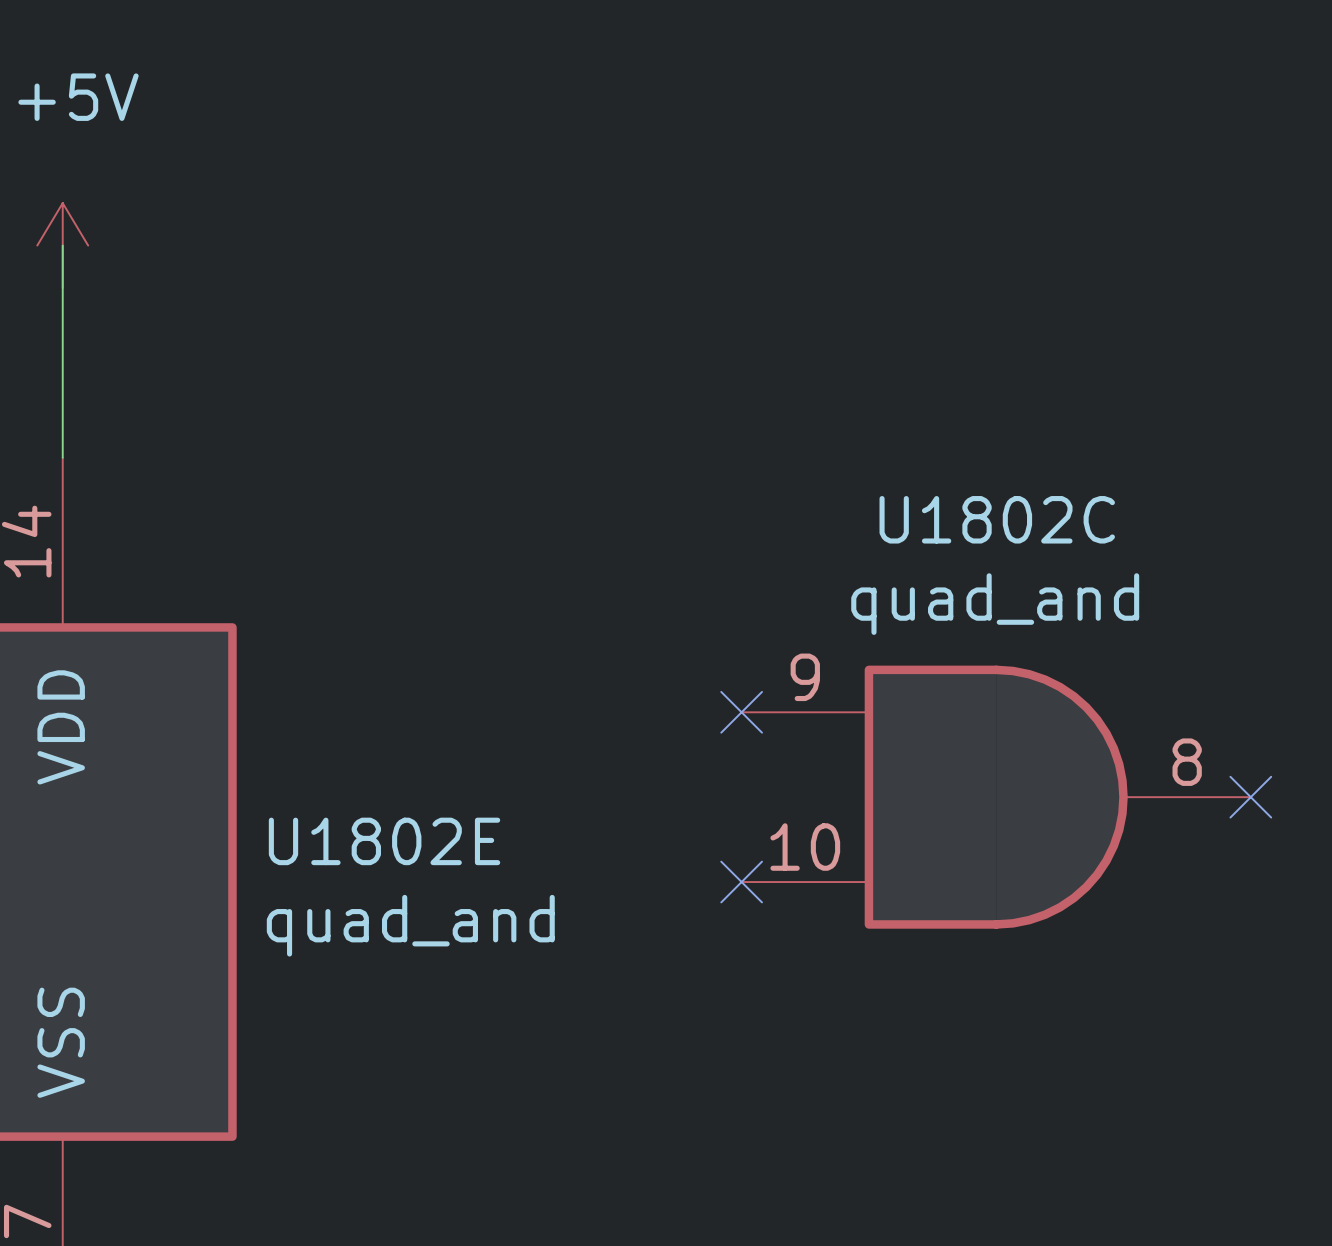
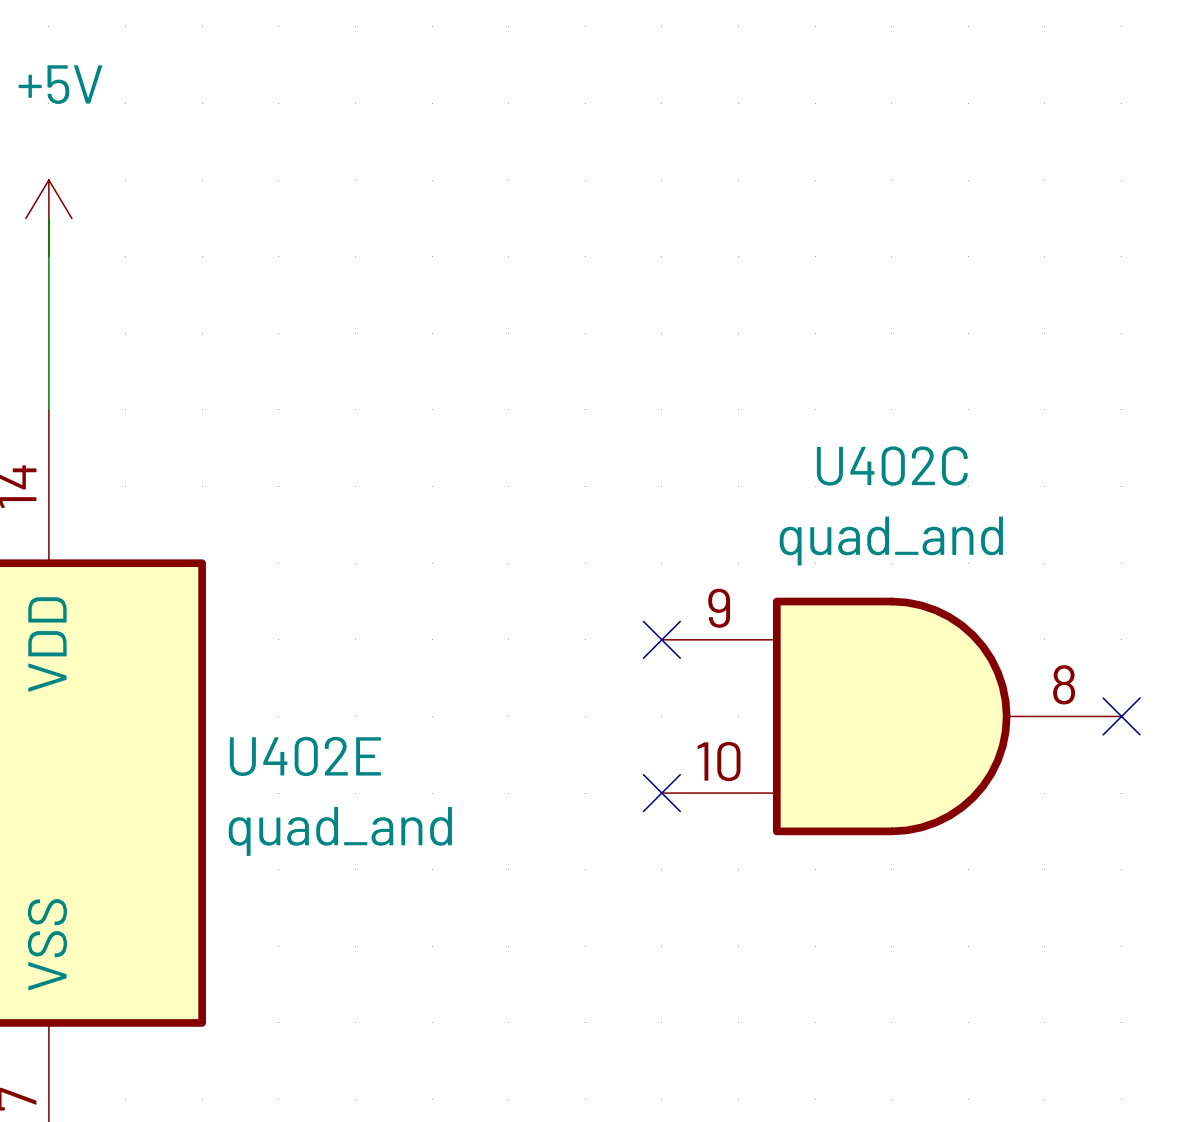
U1802C name: U1802C (997, 519) -> U402C (892, 466)
U1802E name: U1802E (384, 841) -> U402E (305, 756)

